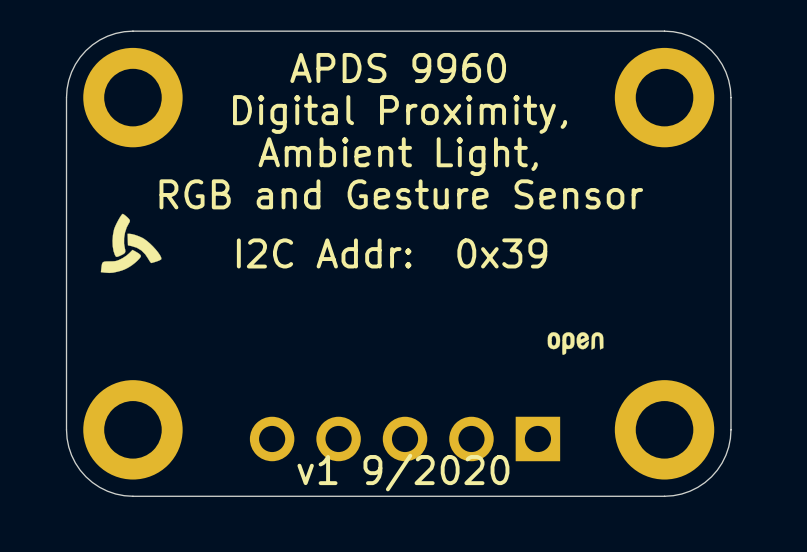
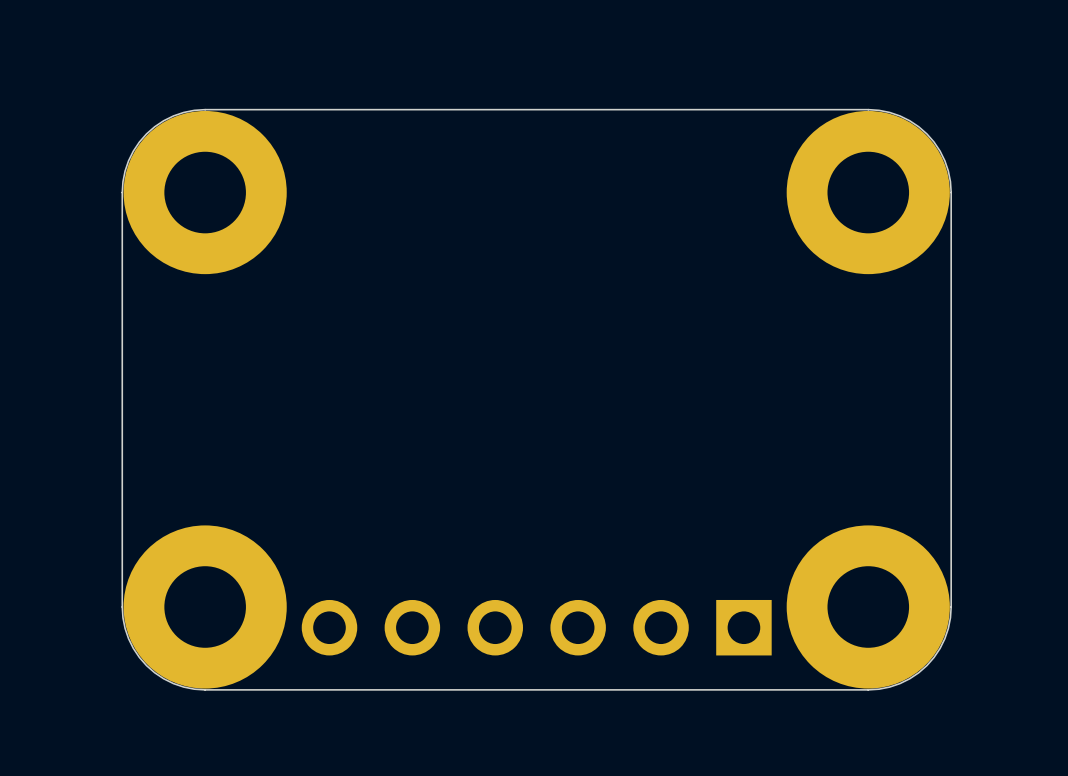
part footprint: [83, 47, 183, 148] -> [123, 110, 287, 275]
part footprint: [614, 47, 715, 148] -> [786, 110, 950, 275]
text: APDS 9960 (398, 68) -> none
text: Digital Proximity, (400, 114) -> none
text: Ambient Light, (398, 156) -> none
text: RGB and Gesture Sensor (401, 194) -> none
drawing: [100, 213, 162, 274] -> none
text: I2C Addr: 0x39 (392, 253) -> none
drawing: [547, 332, 604, 355] -> none
part footprint: [83, 380, 183, 480] -> [123, 525, 287, 689]
part footprint: [614, 380, 715, 480] -> [786, 525, 950, 689]
part footprint: [249, 416, 561, 462] -> [301, 599, 772, 656]
text: v1 9/2020 (403, 472) -> none

